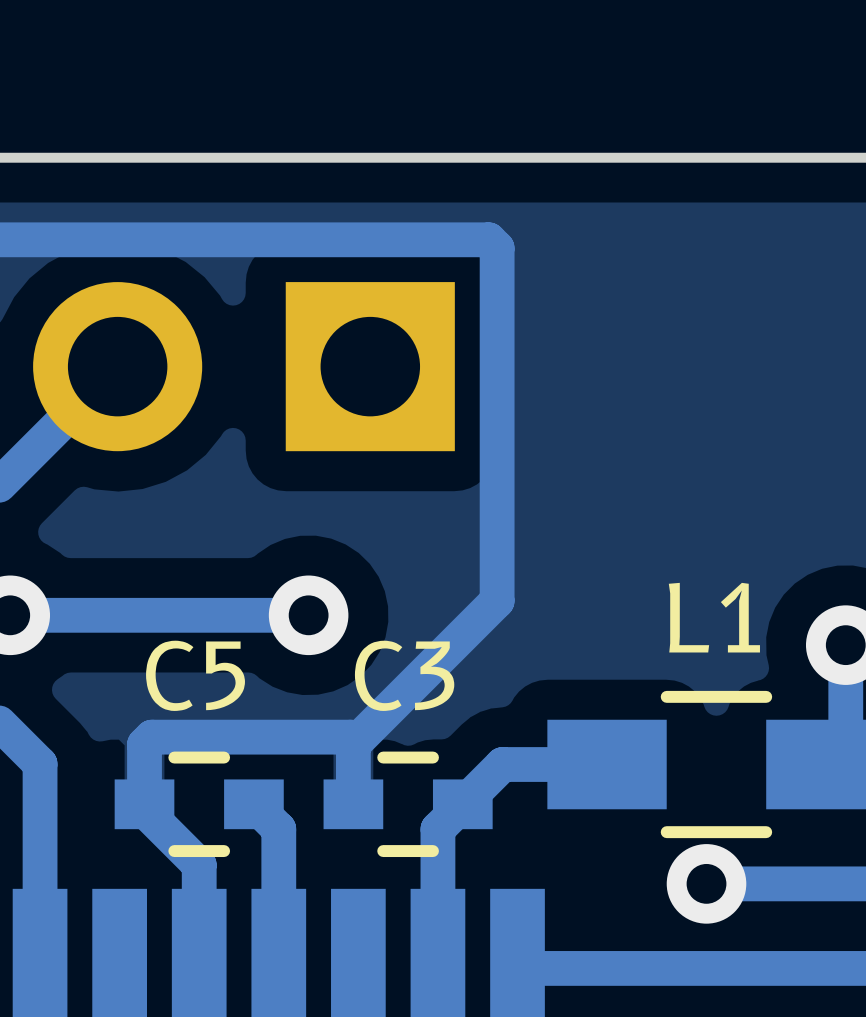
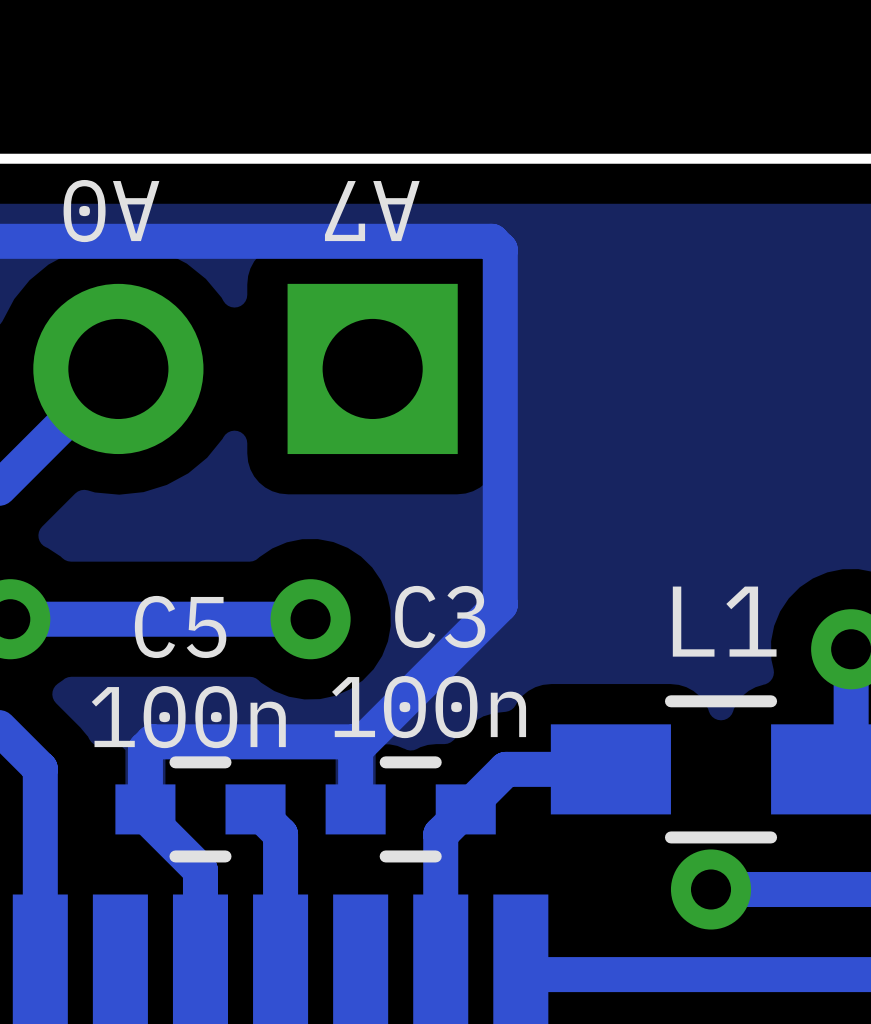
text: none -> A0 (111, 211)
text: none -> A7 (372, 211)
C5 name position: C5 (195, 675) -> C5 (180, 626)
C3 name position: C3 (404, 675) -> C3 (440, 616)
C3 value: none -> 100n (429, 707)
C5 value: none -> 100n (188, 717)

